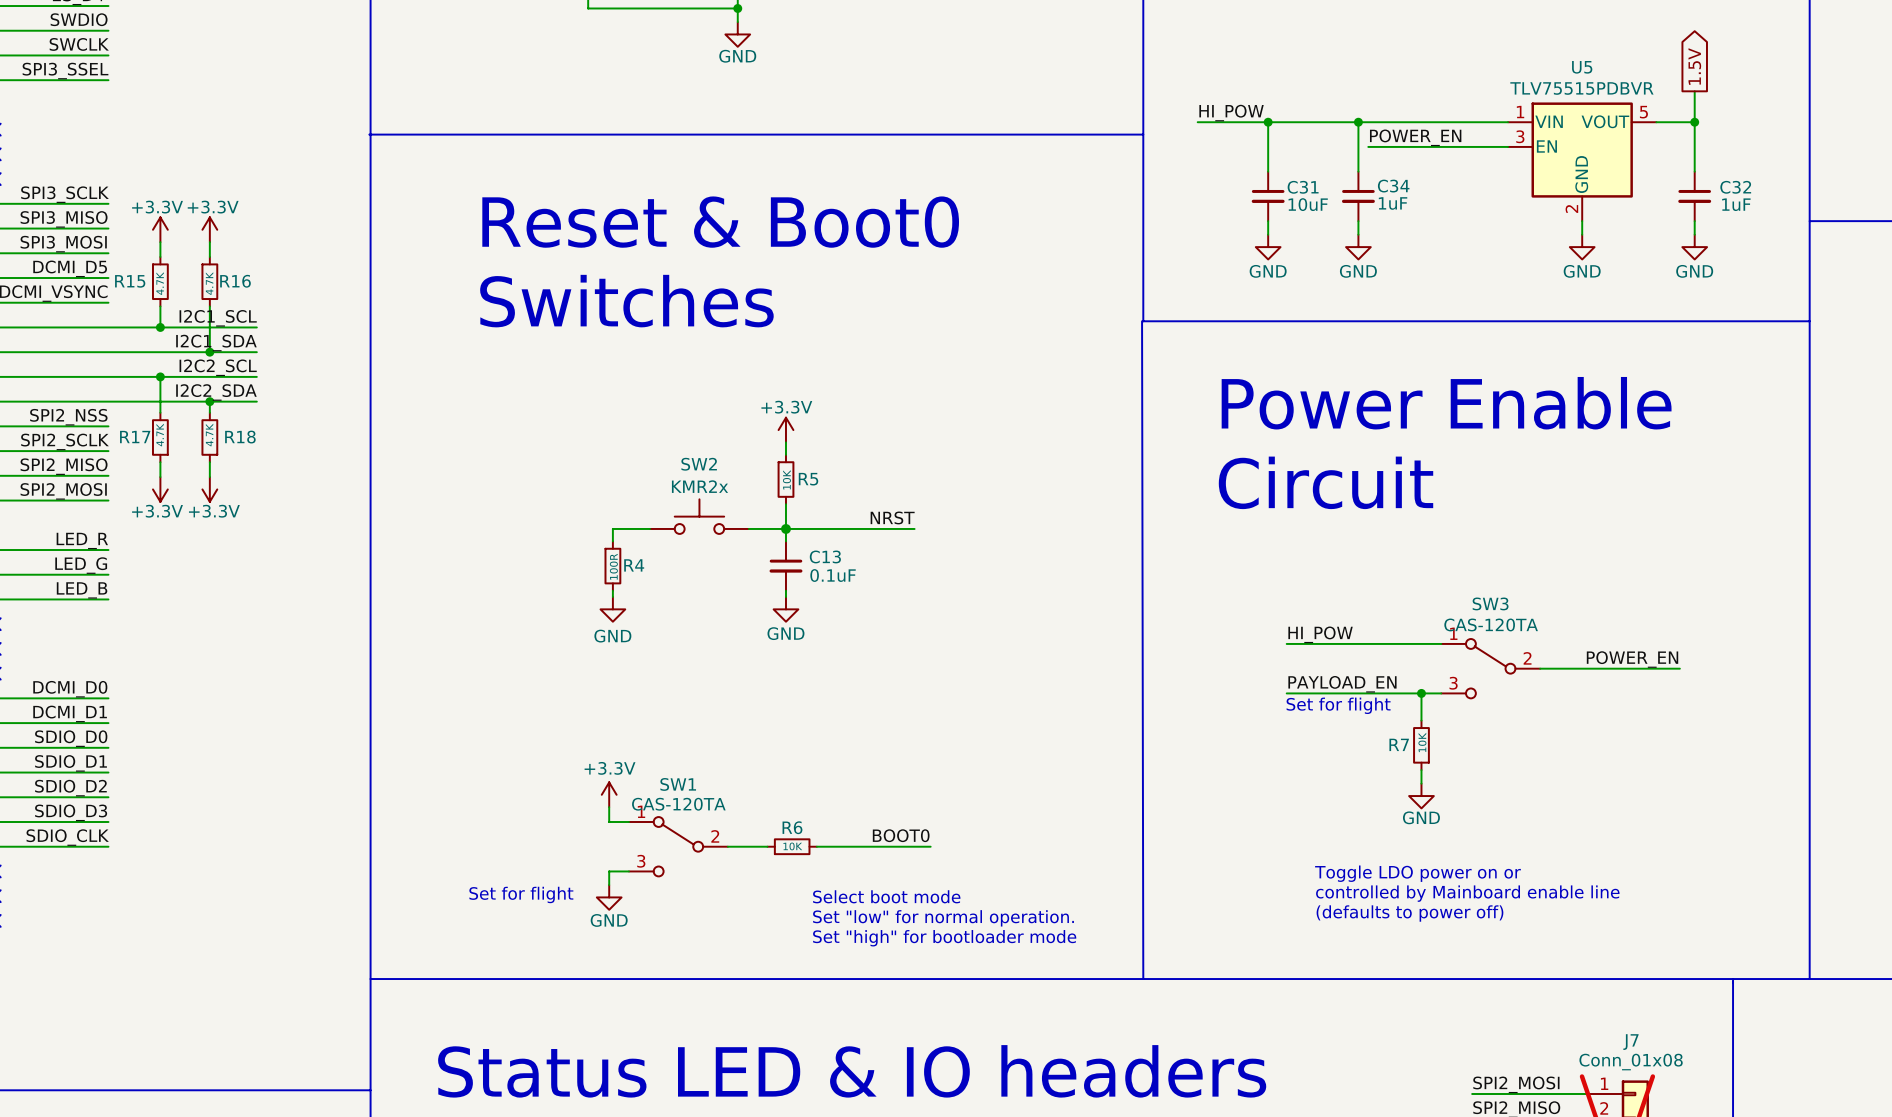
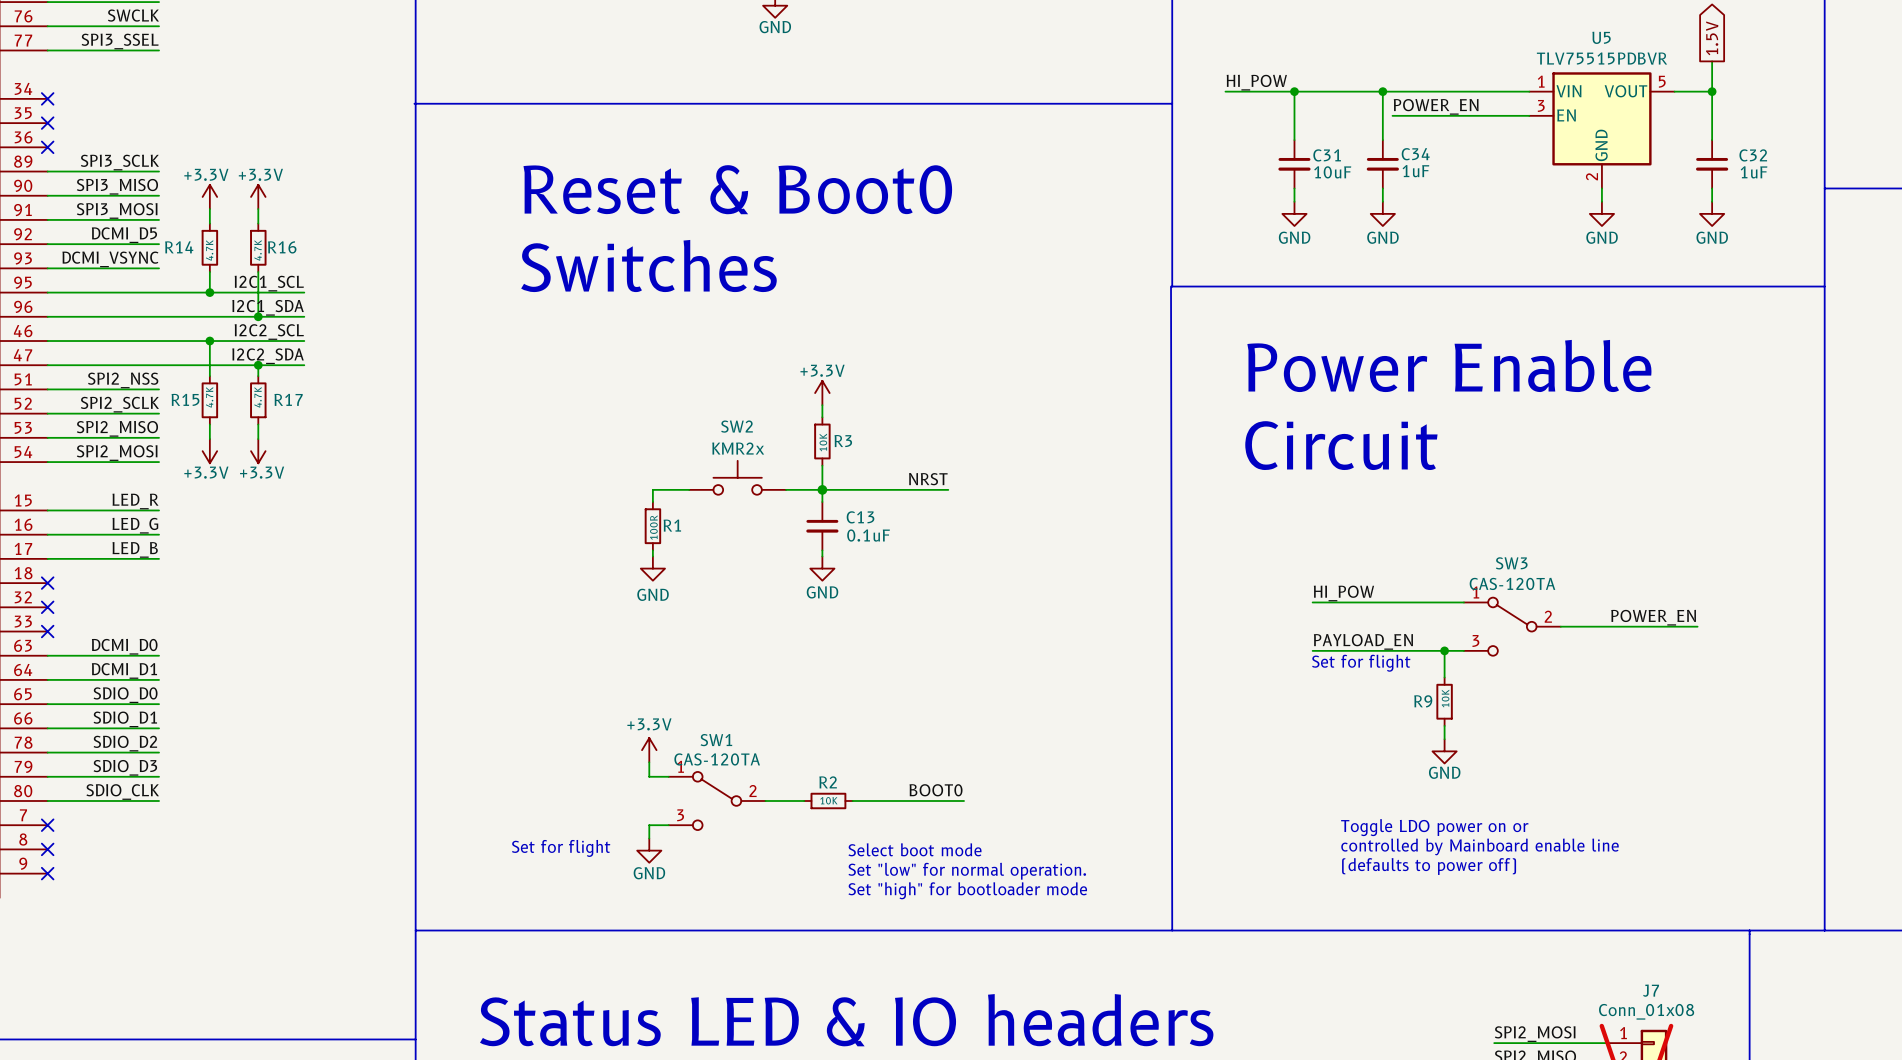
R15 name: R15 (130, 281) -> R14 (179, 247)
R17 name: R17 (135, 437) -> R15 (185, 399)
R18 name: R18 (240, 437) -> R17 (288, 399)
R5 name: R5 (808, 479) -> R3 (843, 441)
R4 name: R4 (634, 565) -> R1 (672, 525)
R7 name: R7 (1399, 744) -> R9 (1423, 701)
R6 name: R6 (792, 827) -> R2 (828, 782)

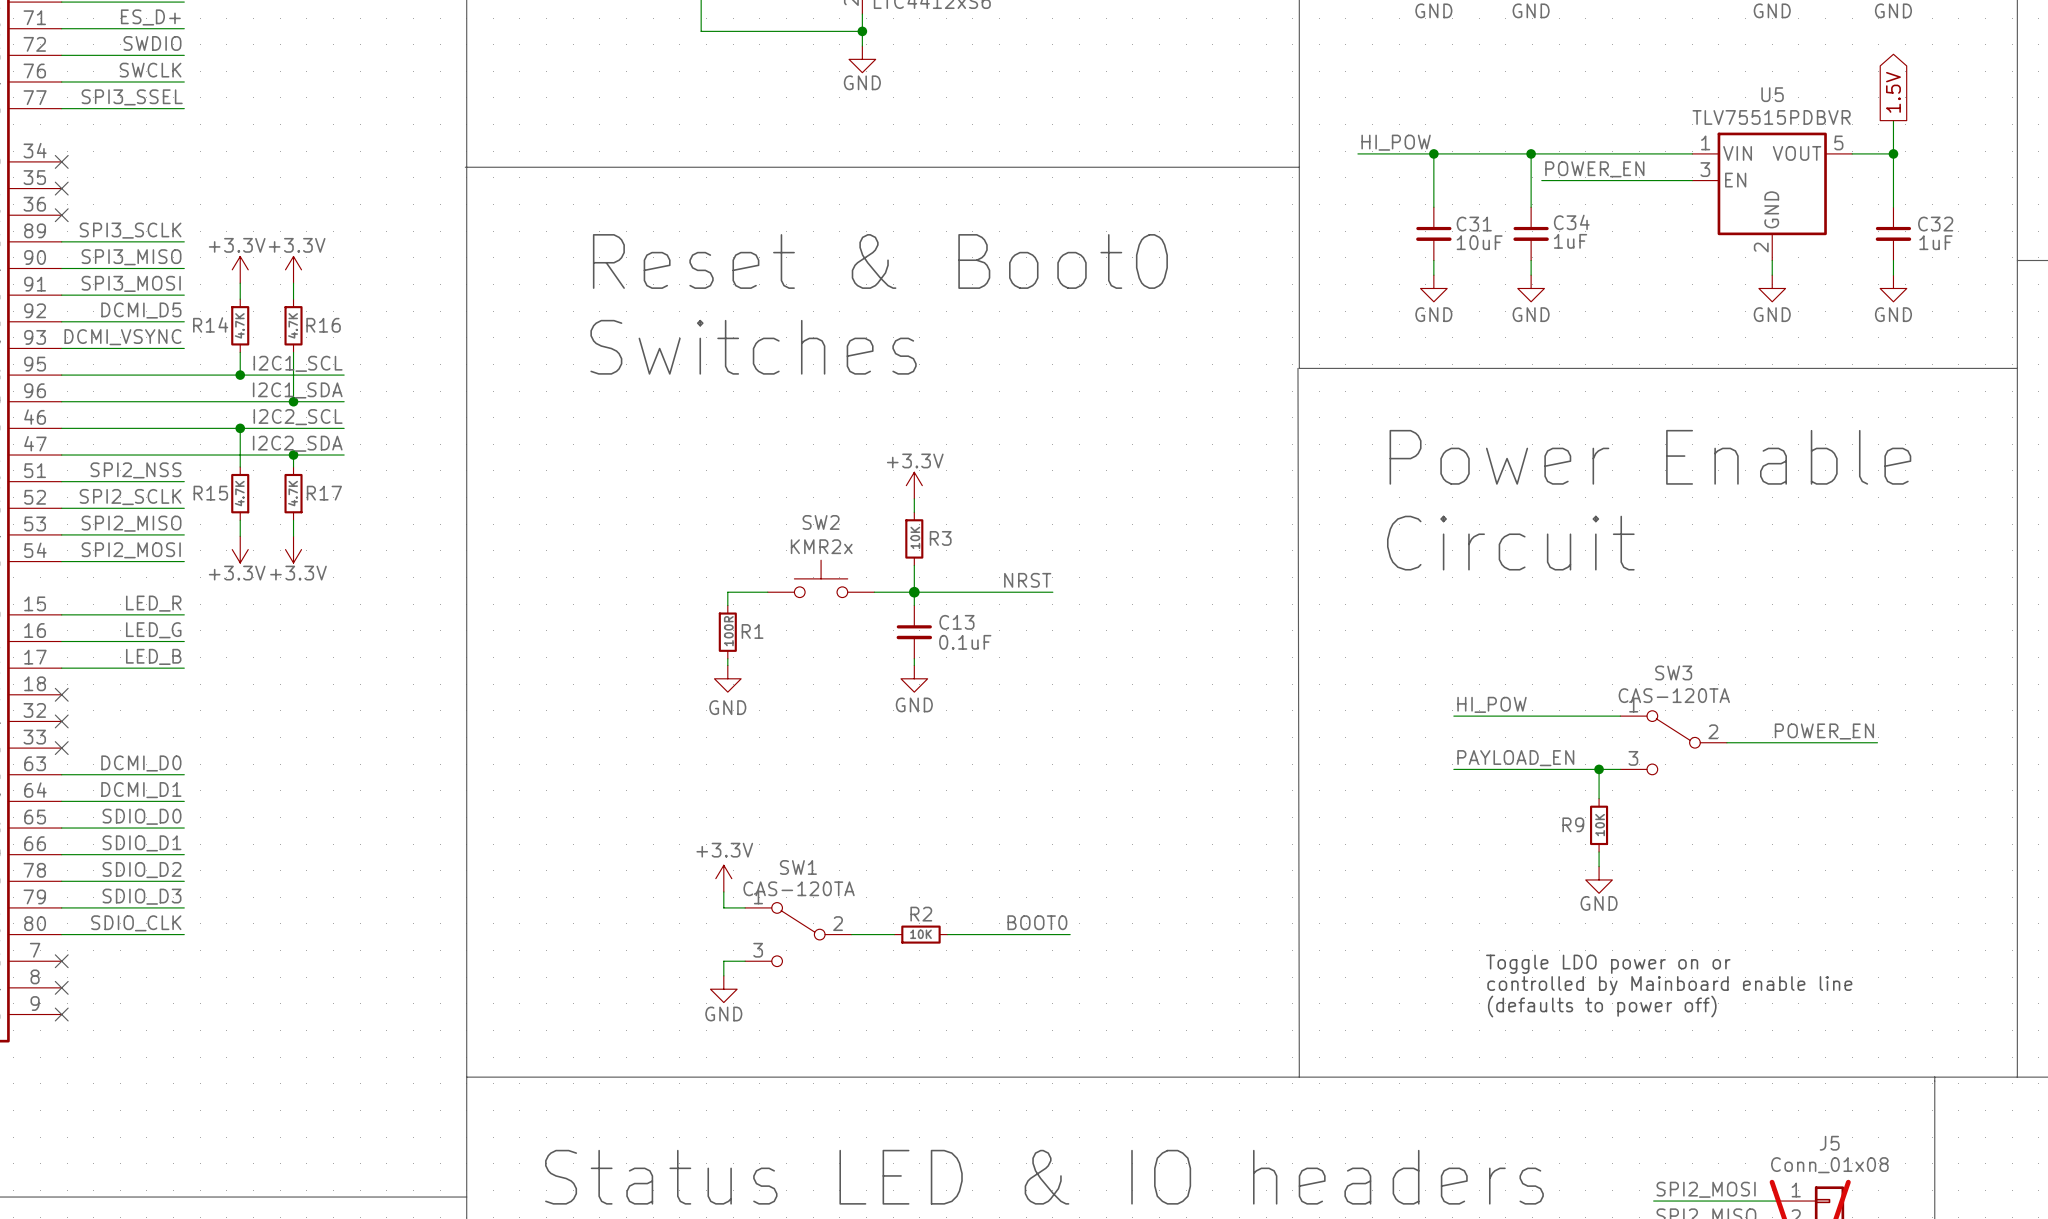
text: Set for flight (1361, 663) -> none
text: Set for flight (561, 848) -> none
text: Select boot mode (914, 849) -> none
text: Set "low" for normal operation. (967, 871) -> none
text: Set "high" for bootloader mode (967, 890) -> none
J7 name: J7 (1651, 990) -> J5 (1829, 1143)

